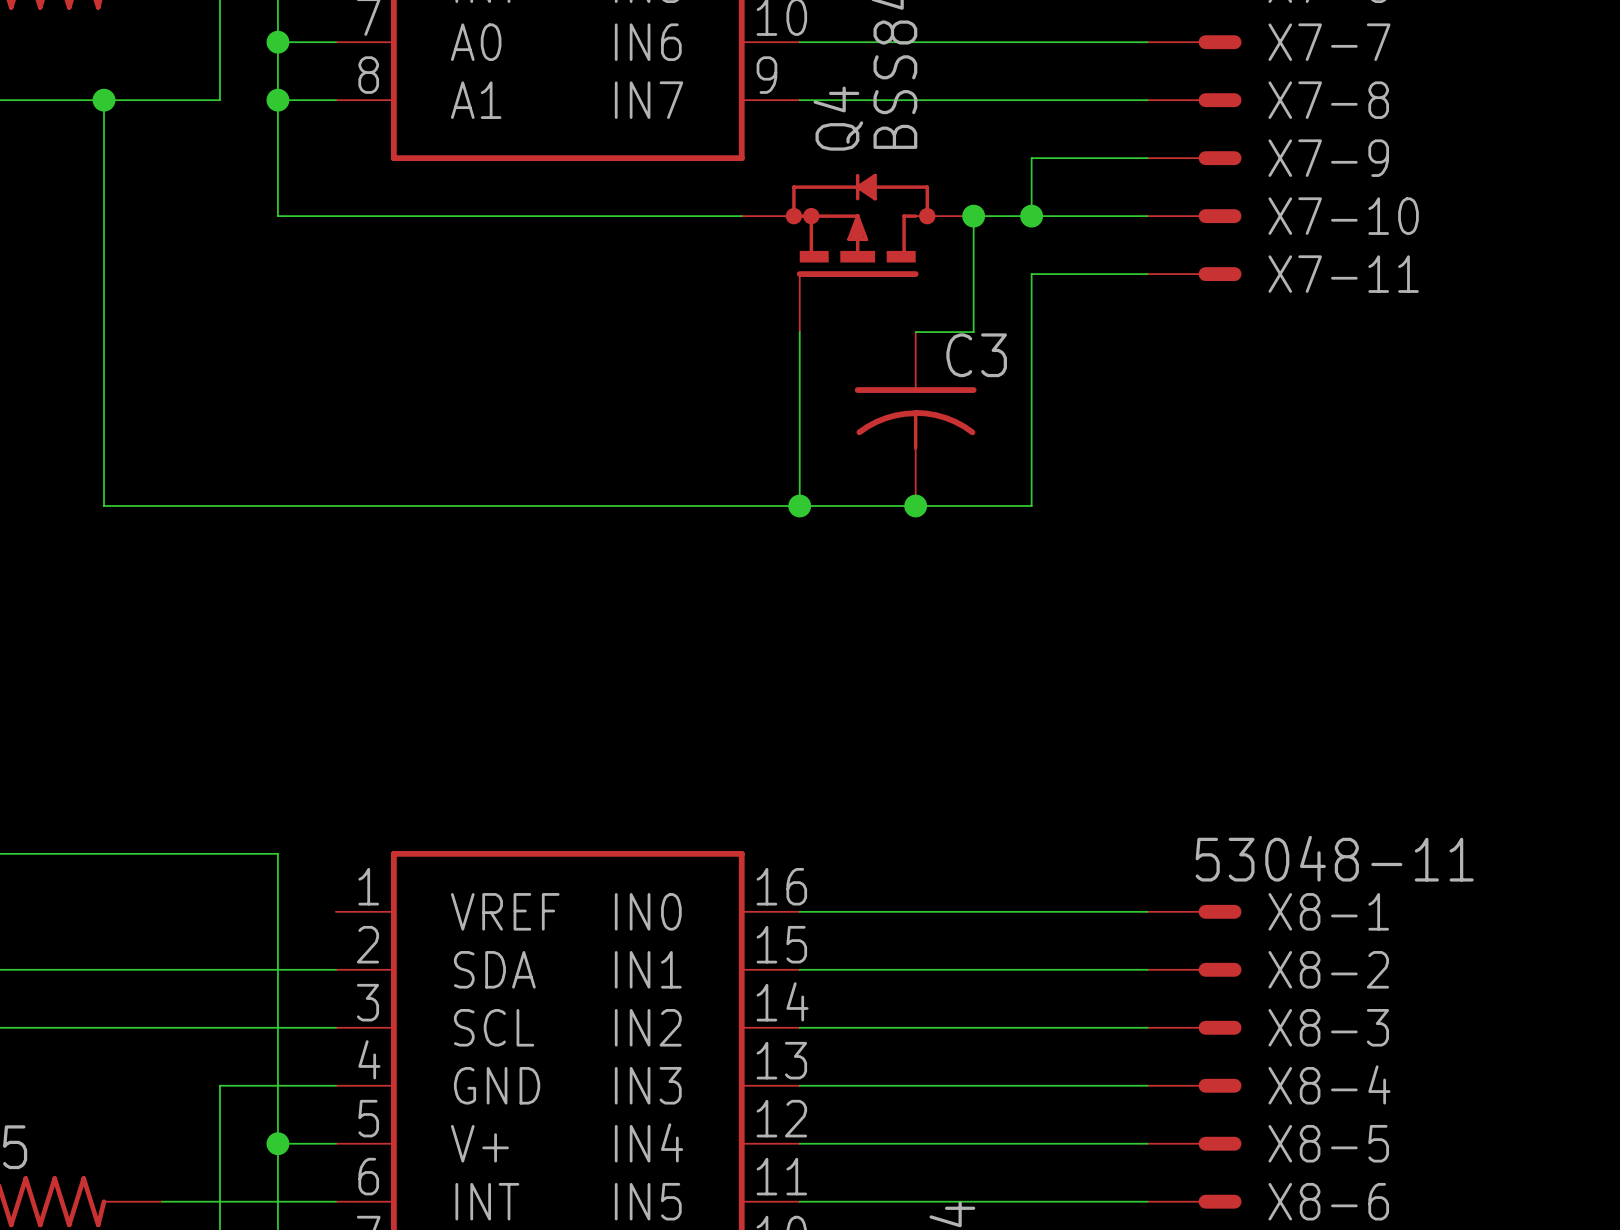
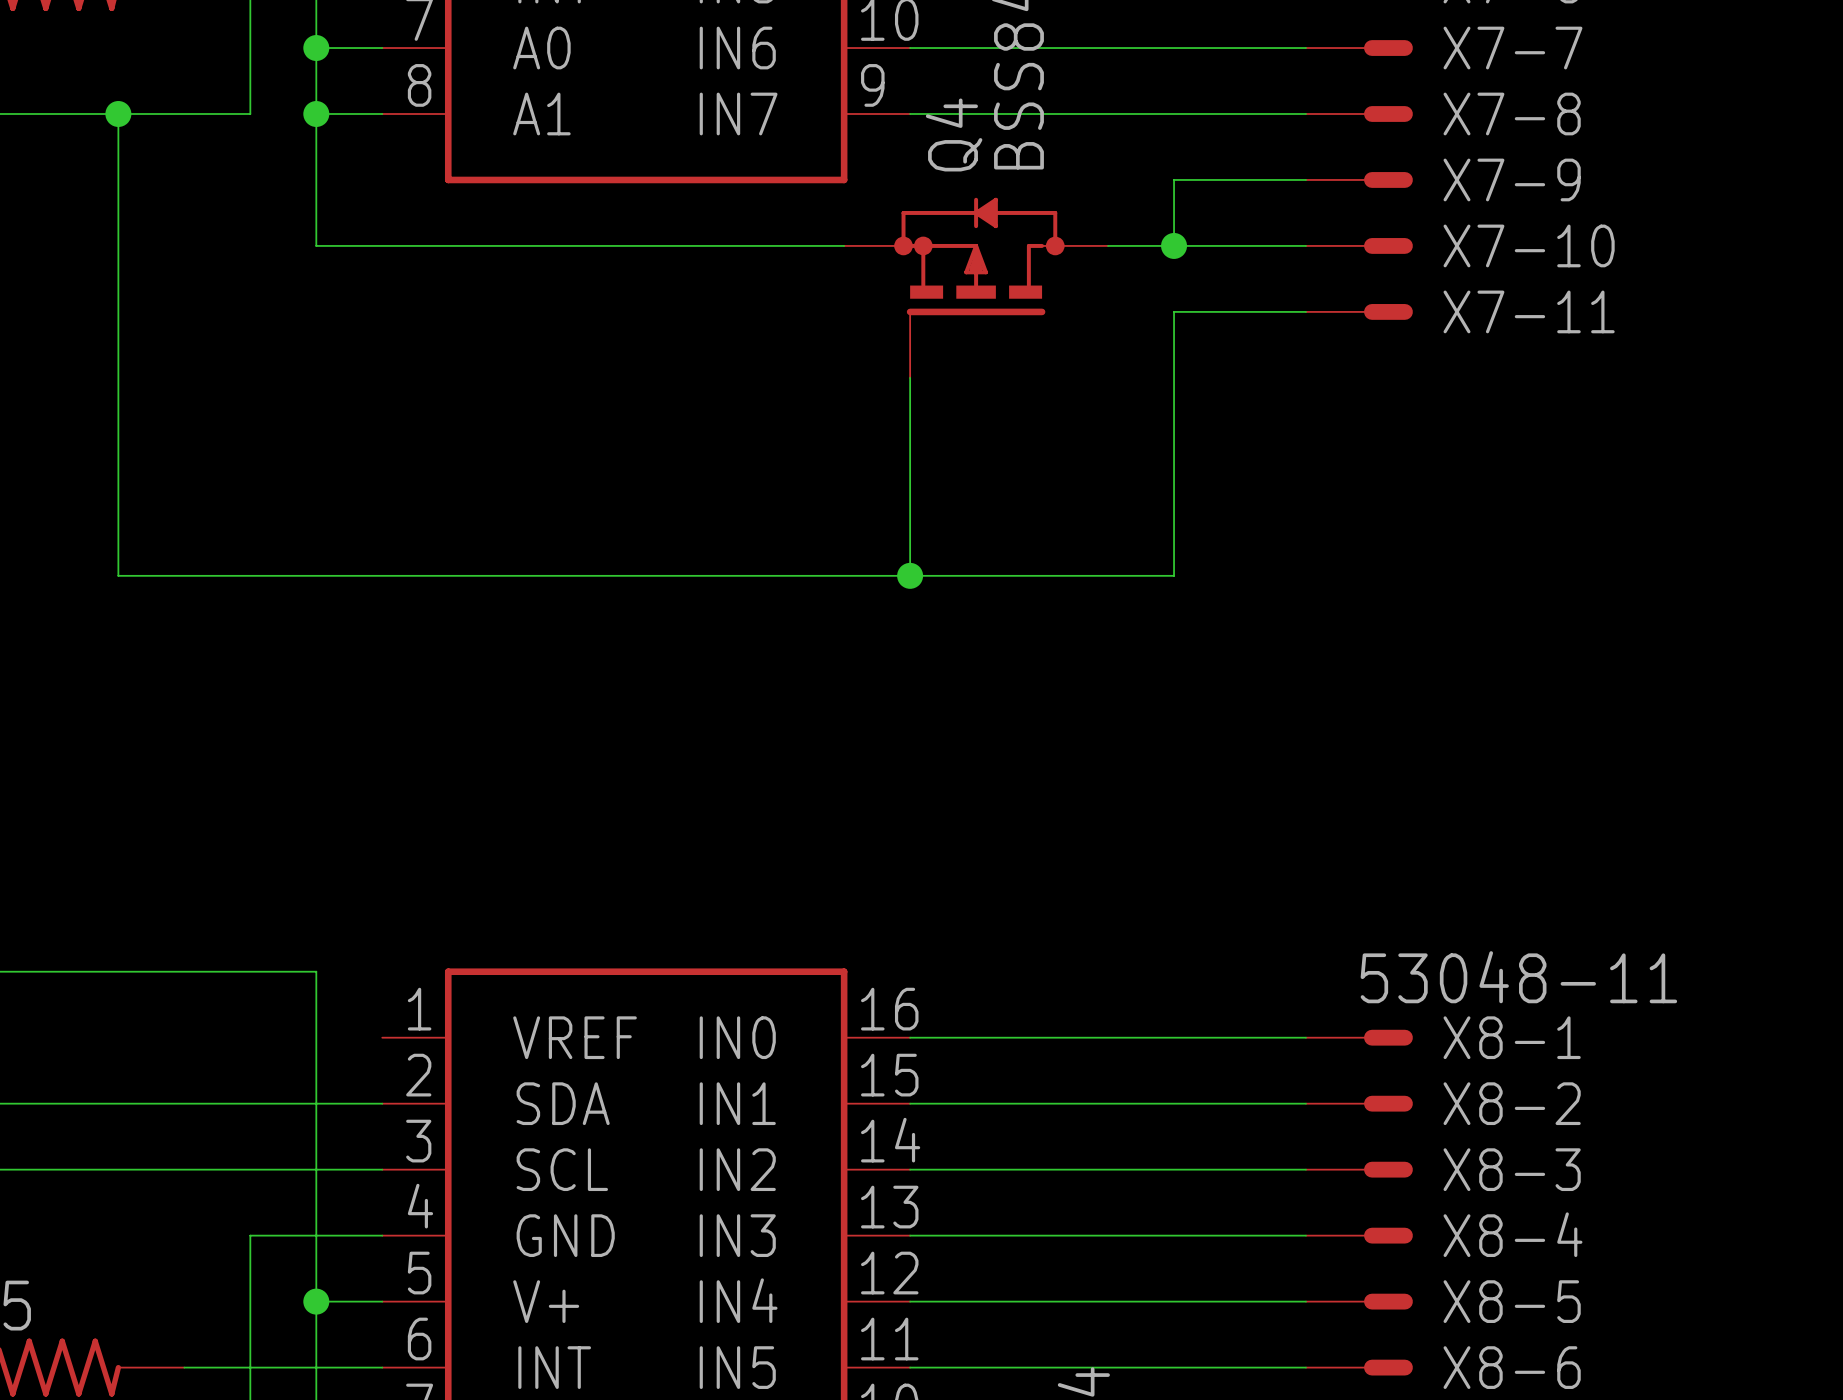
wire: (973, 216) (973, 332) (915, 332) -> none
junction: (973, 216) -> none
C3: (915, 419) -> none
junction: (915, 506) -> none

